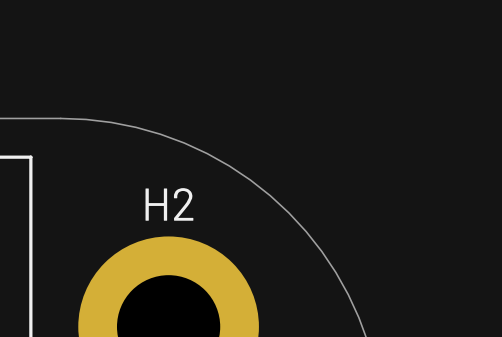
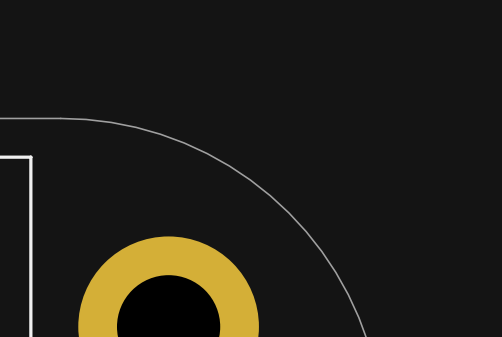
H2 name: H2 (169, 204) -> none

